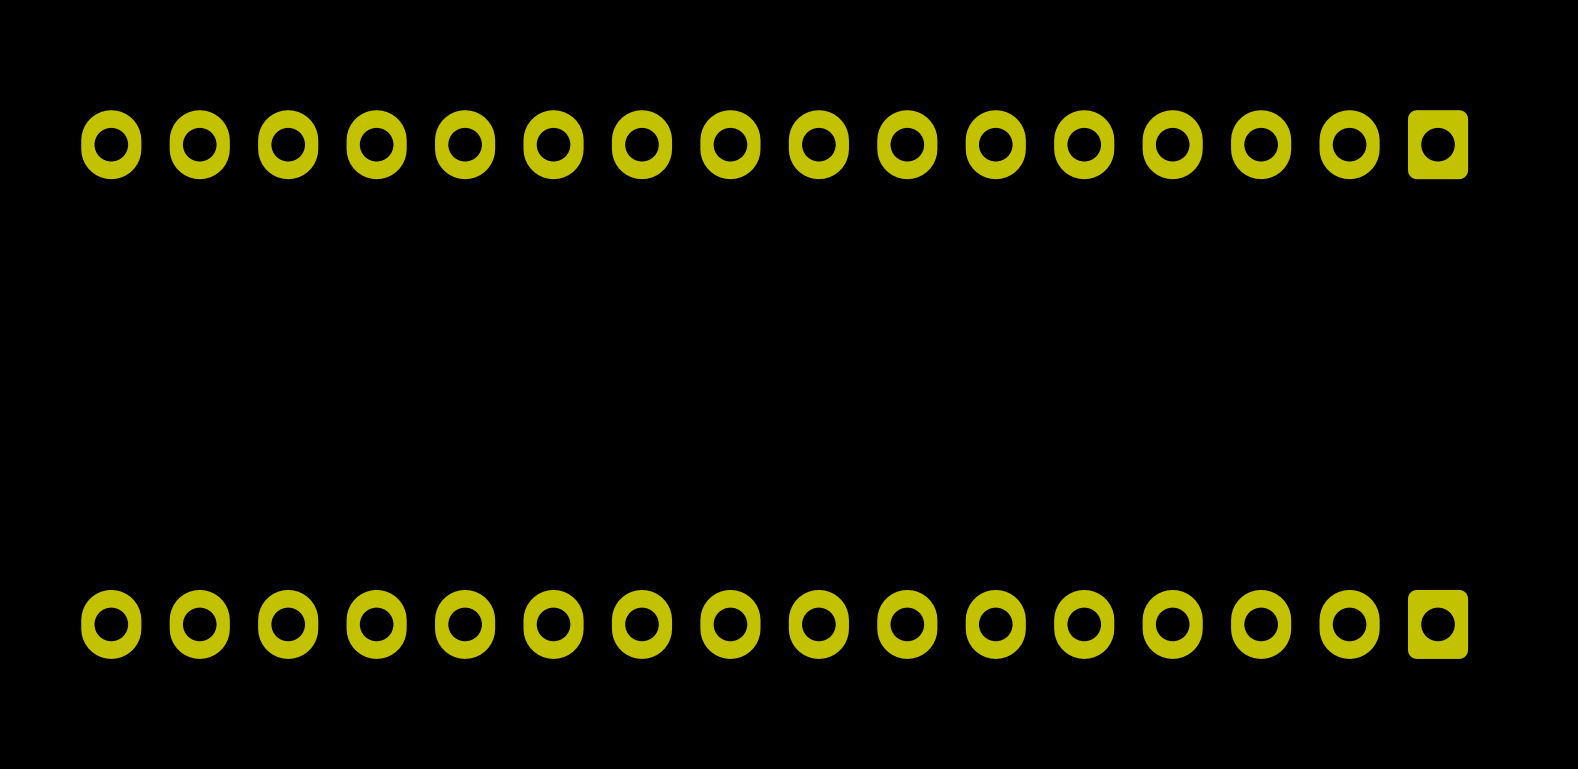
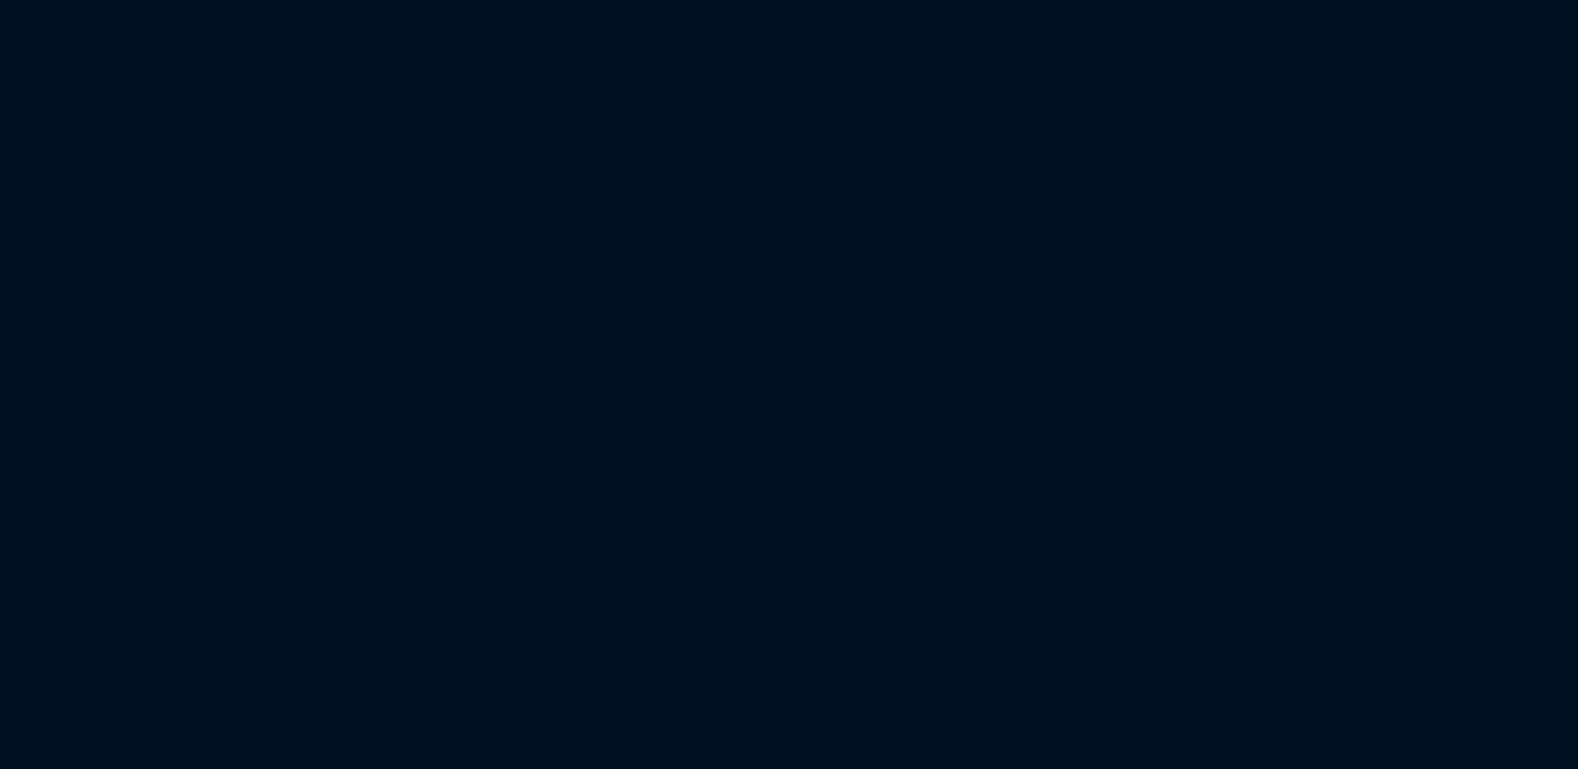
part: (774, 144) -> none
part: (774, 624) -> none

